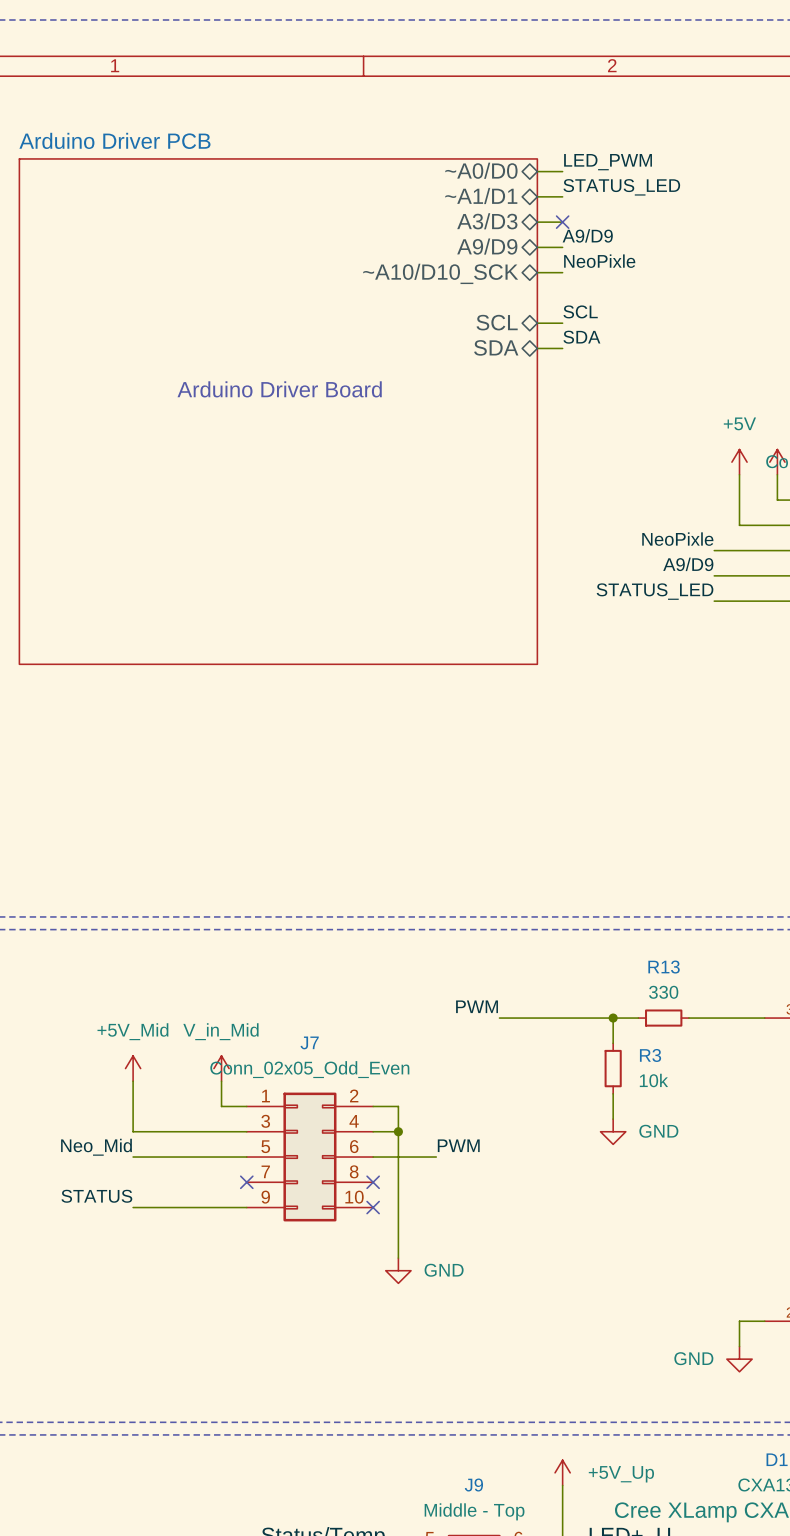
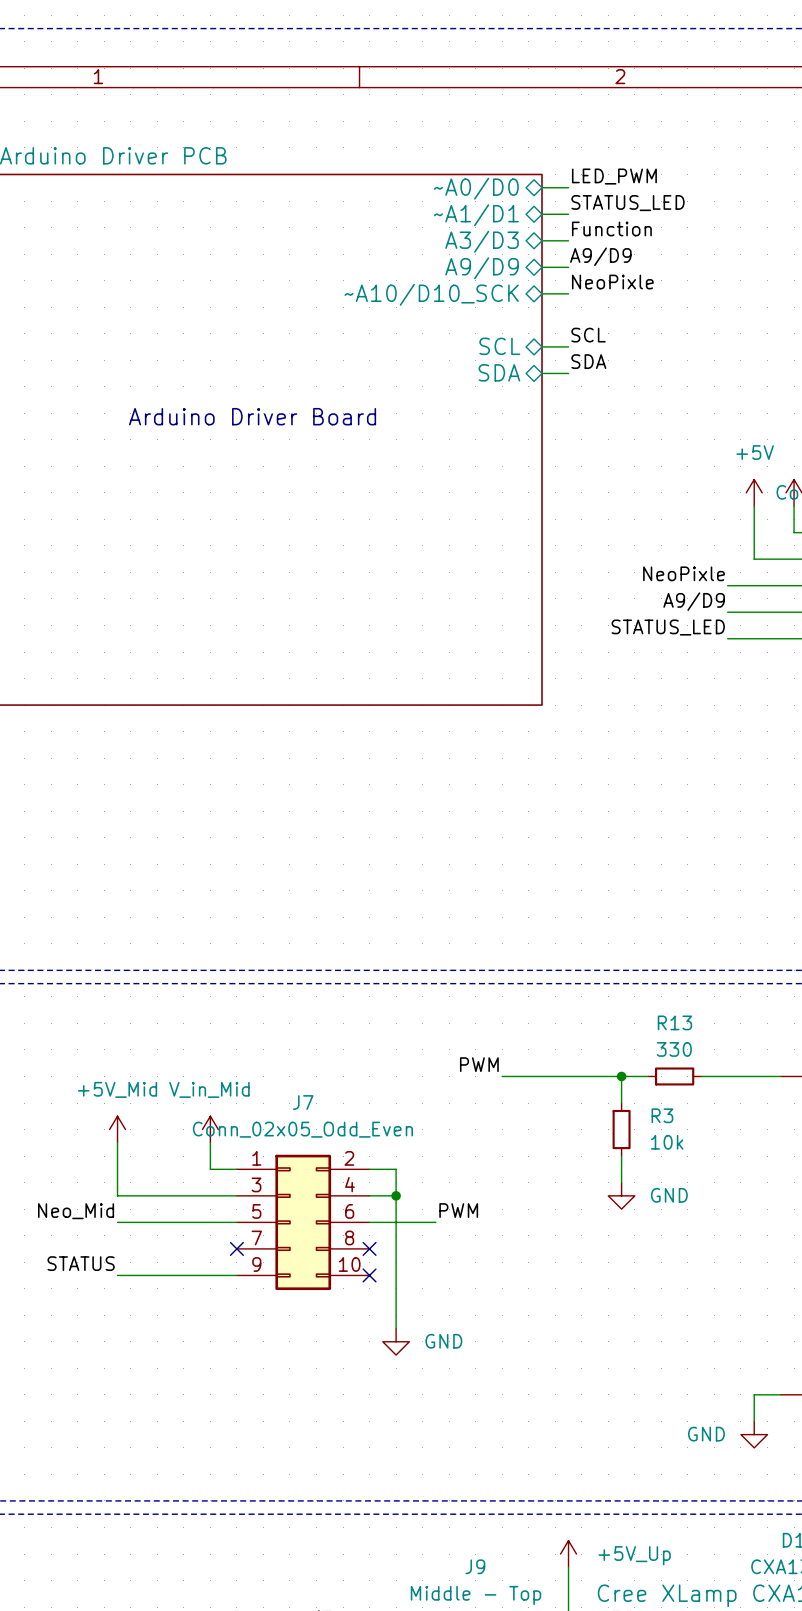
label: none -> Function (611, 228)
no-connect mark: (562, 222) -> none

